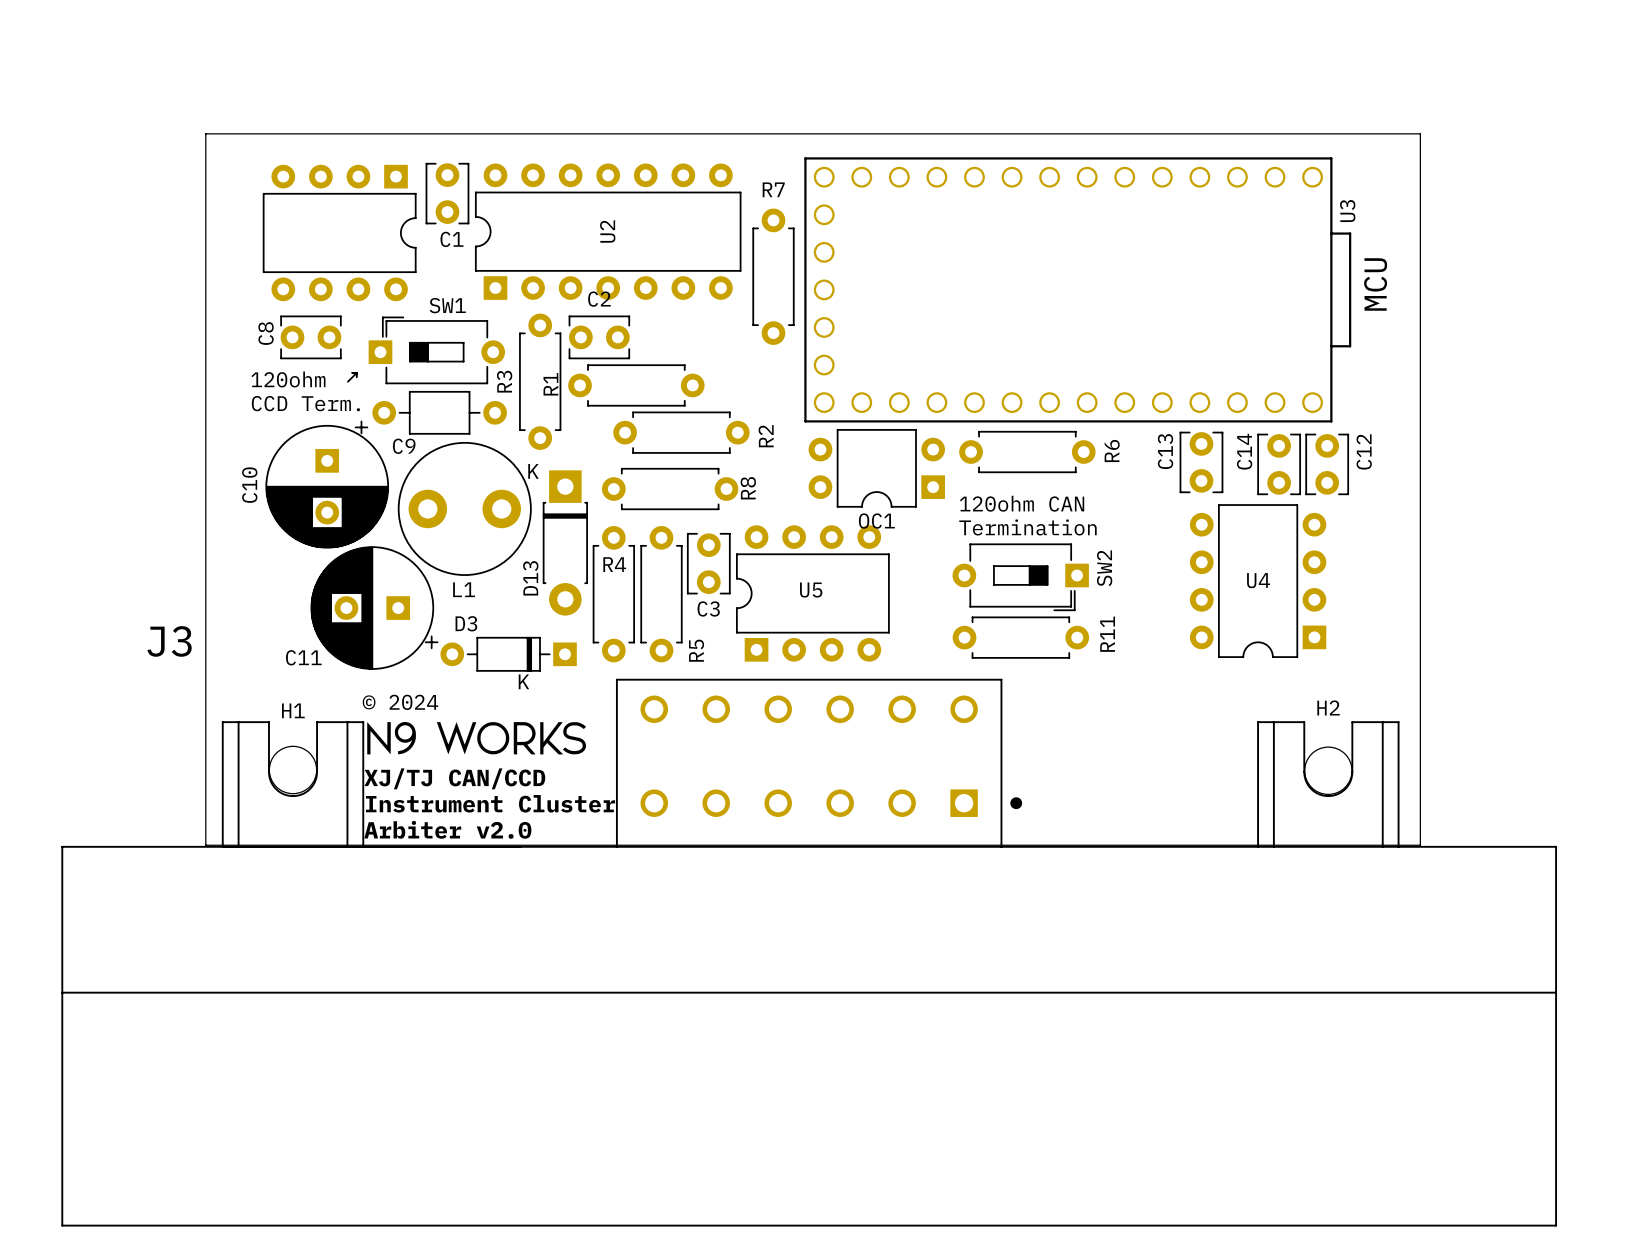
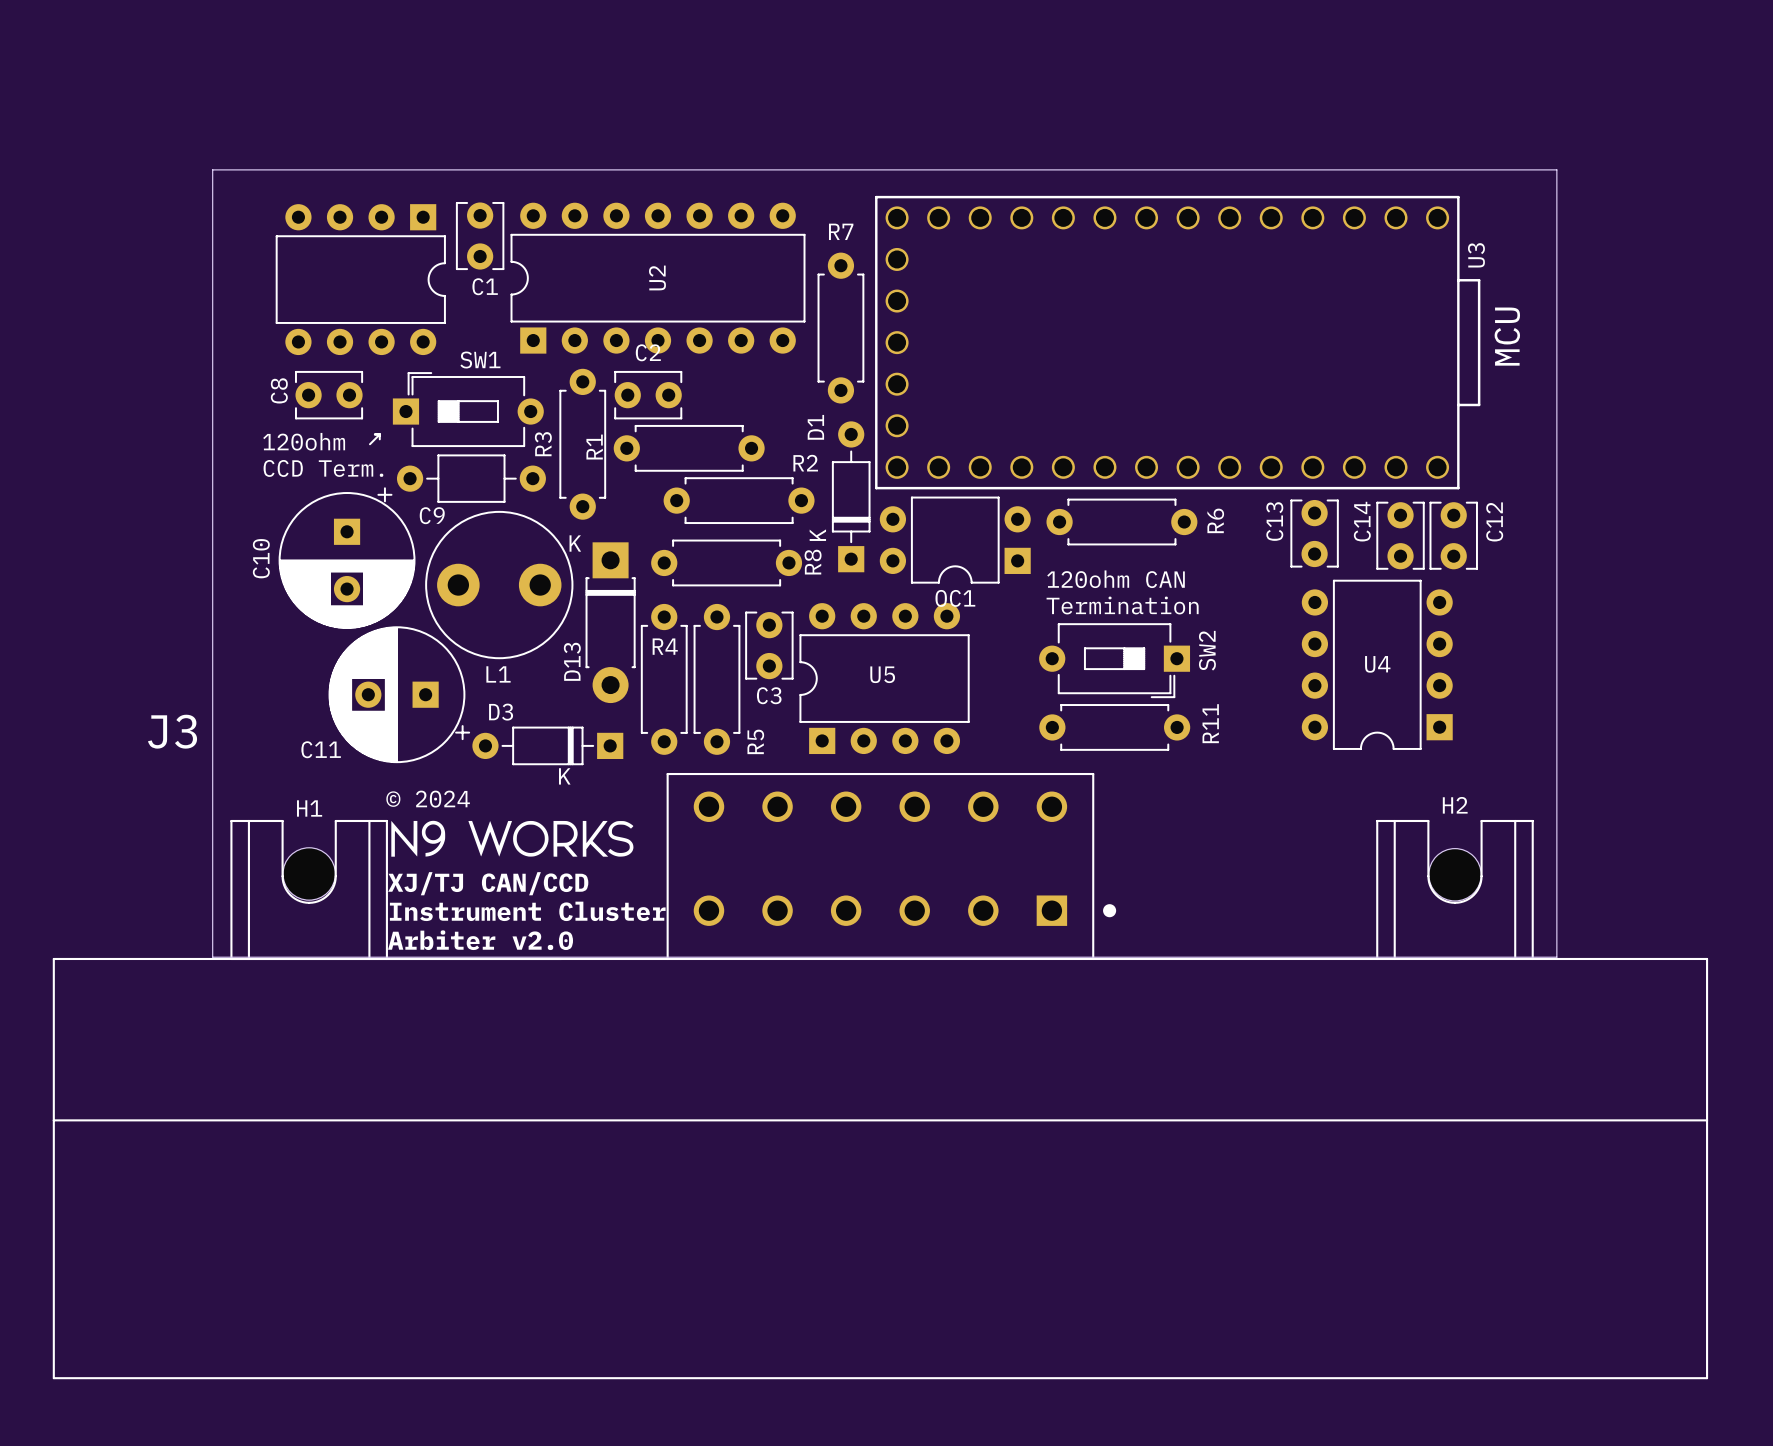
D1: none -> (851, 496)
R2 name rotation: 0° (766, 436) -> 90° clockwise (805, 463)
R2 name position: R2 (766, 436) -> R2 (805, 463)

